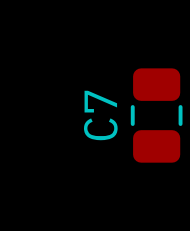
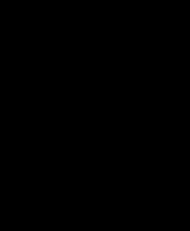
C7: (156, 115) -> none

